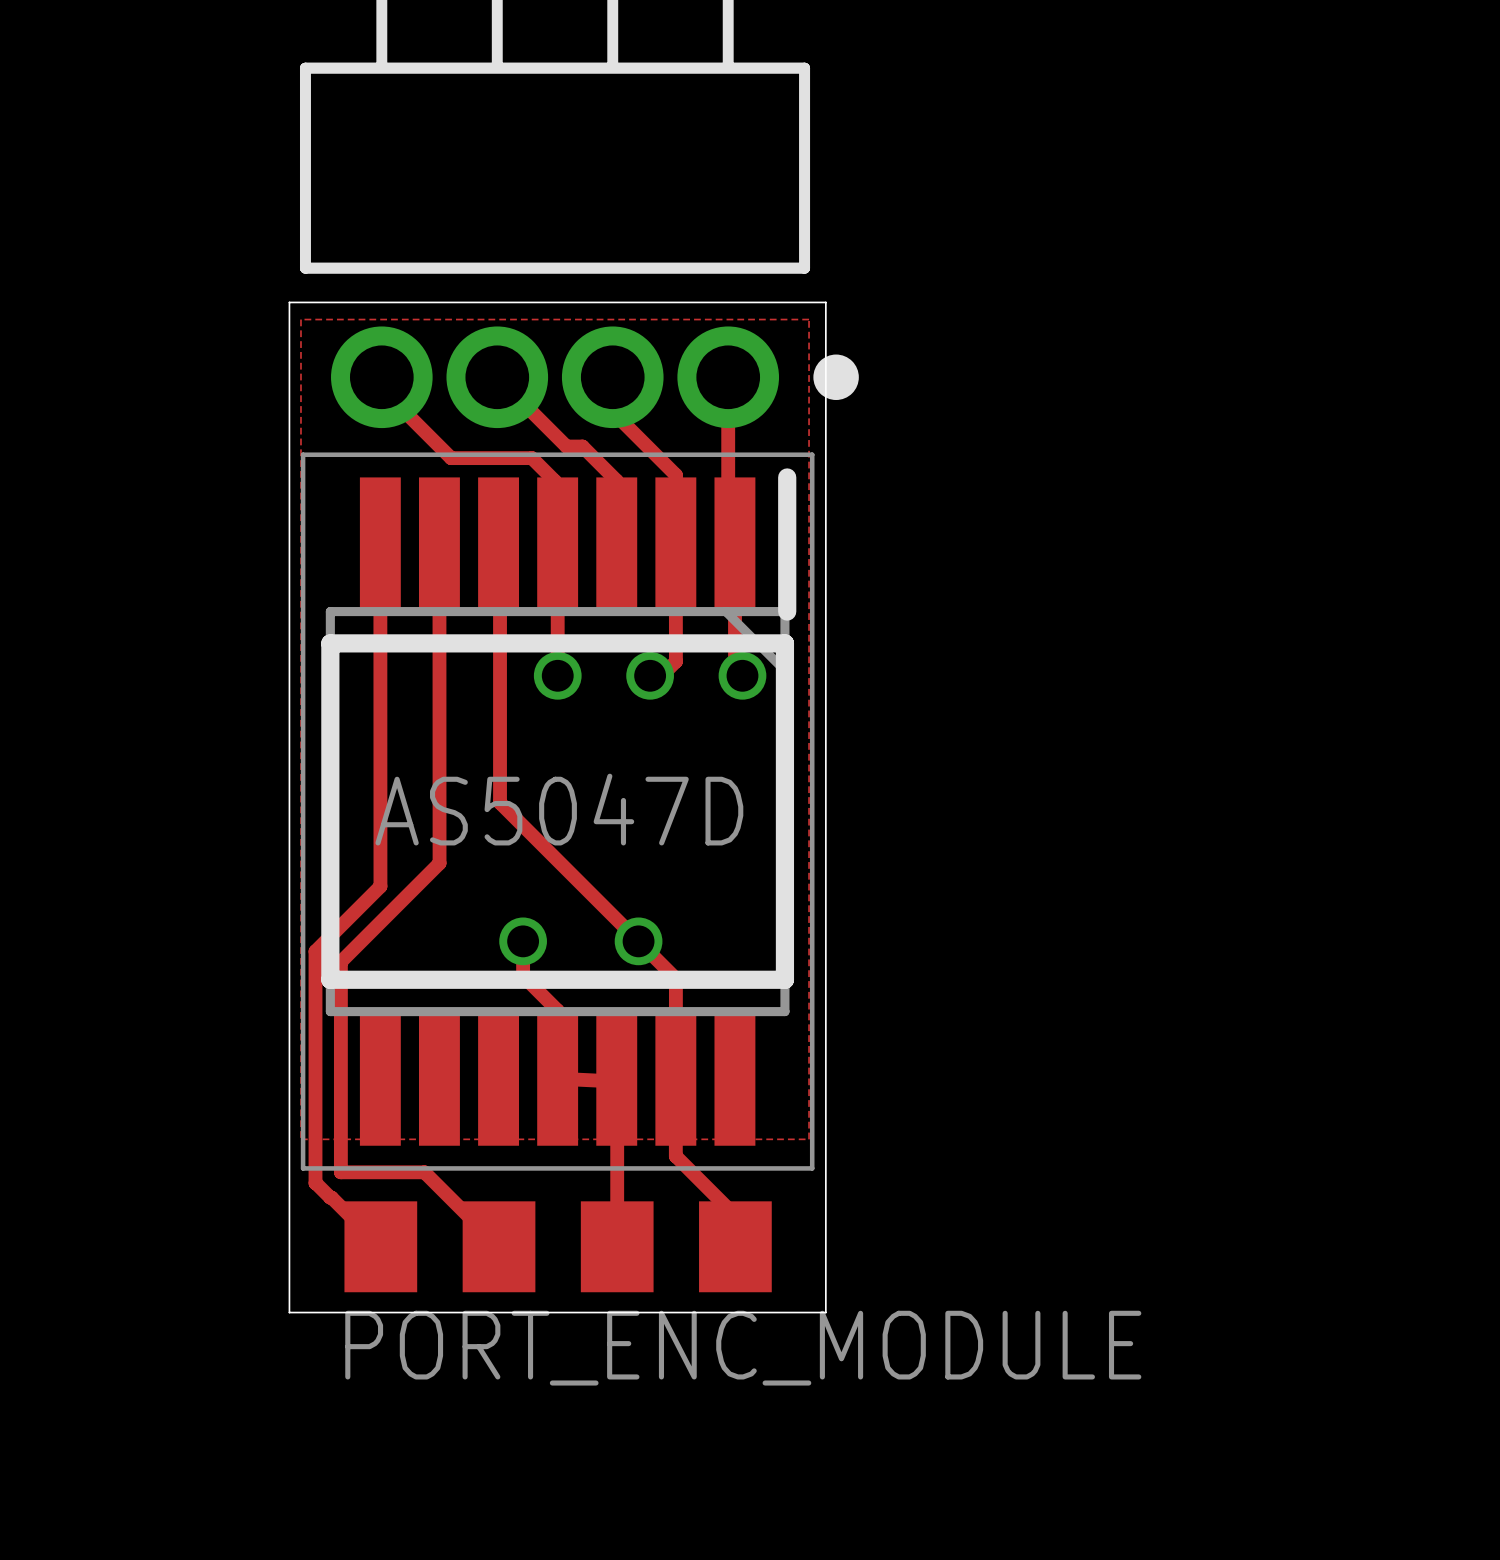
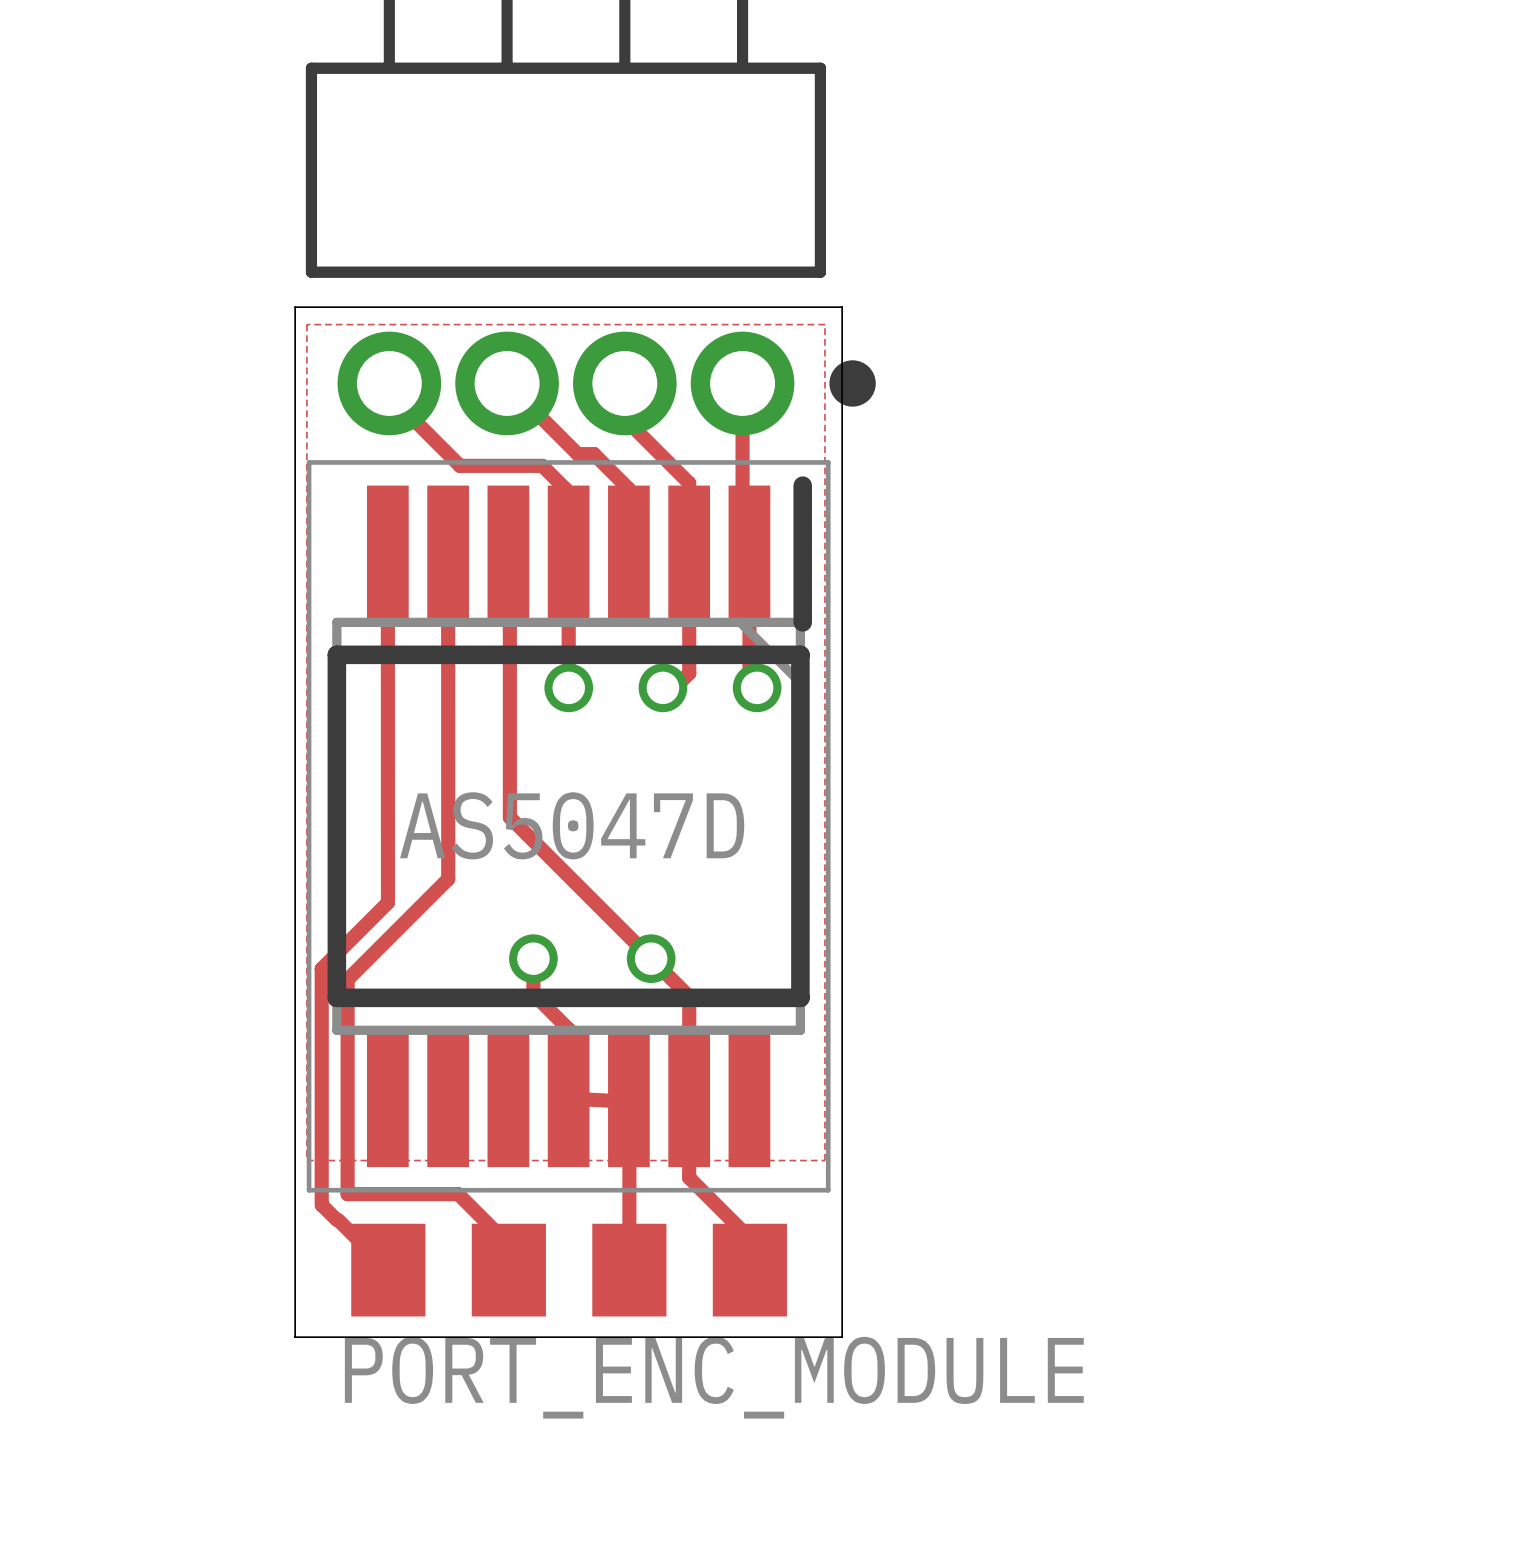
track: (424, 1172) (499, 1246) -> (432, 1194) (458, 1194) (508, 1244) (508, 1270)

